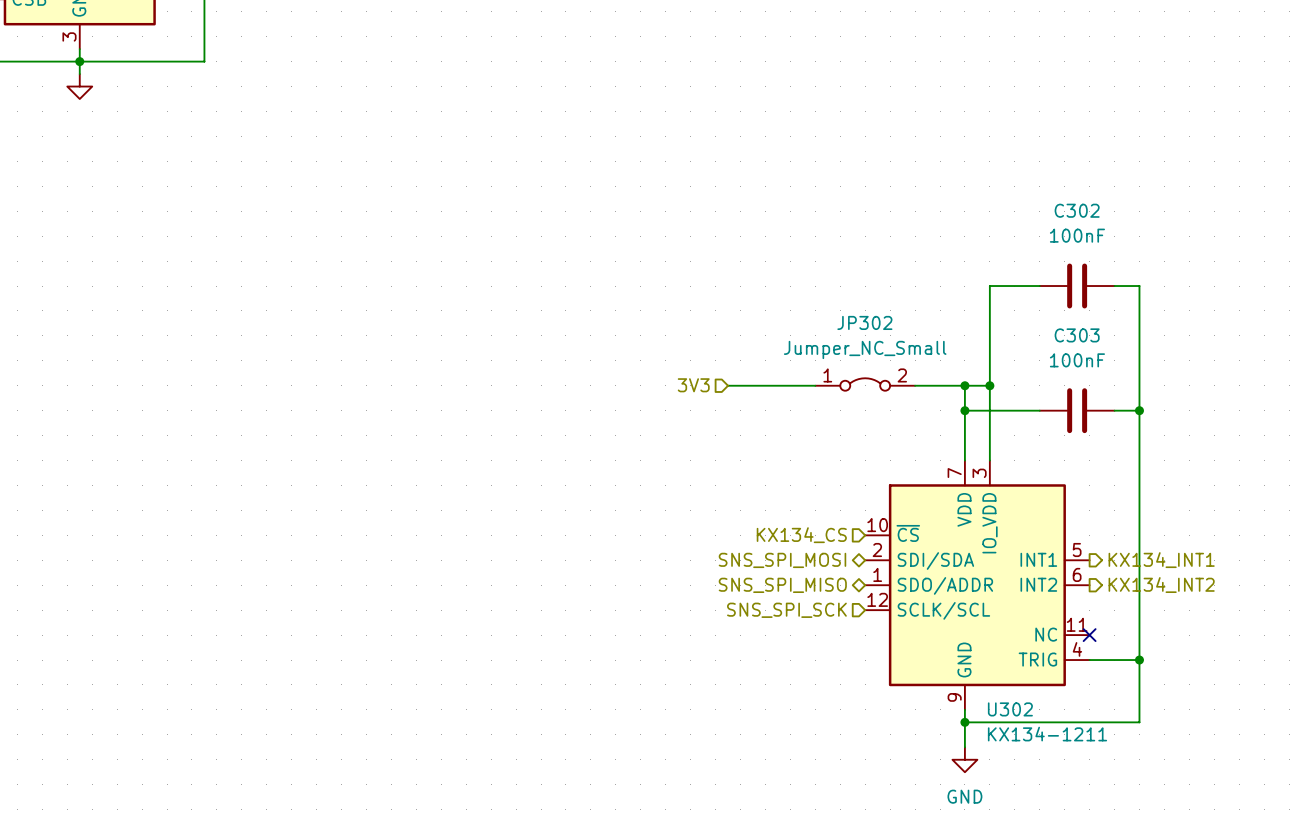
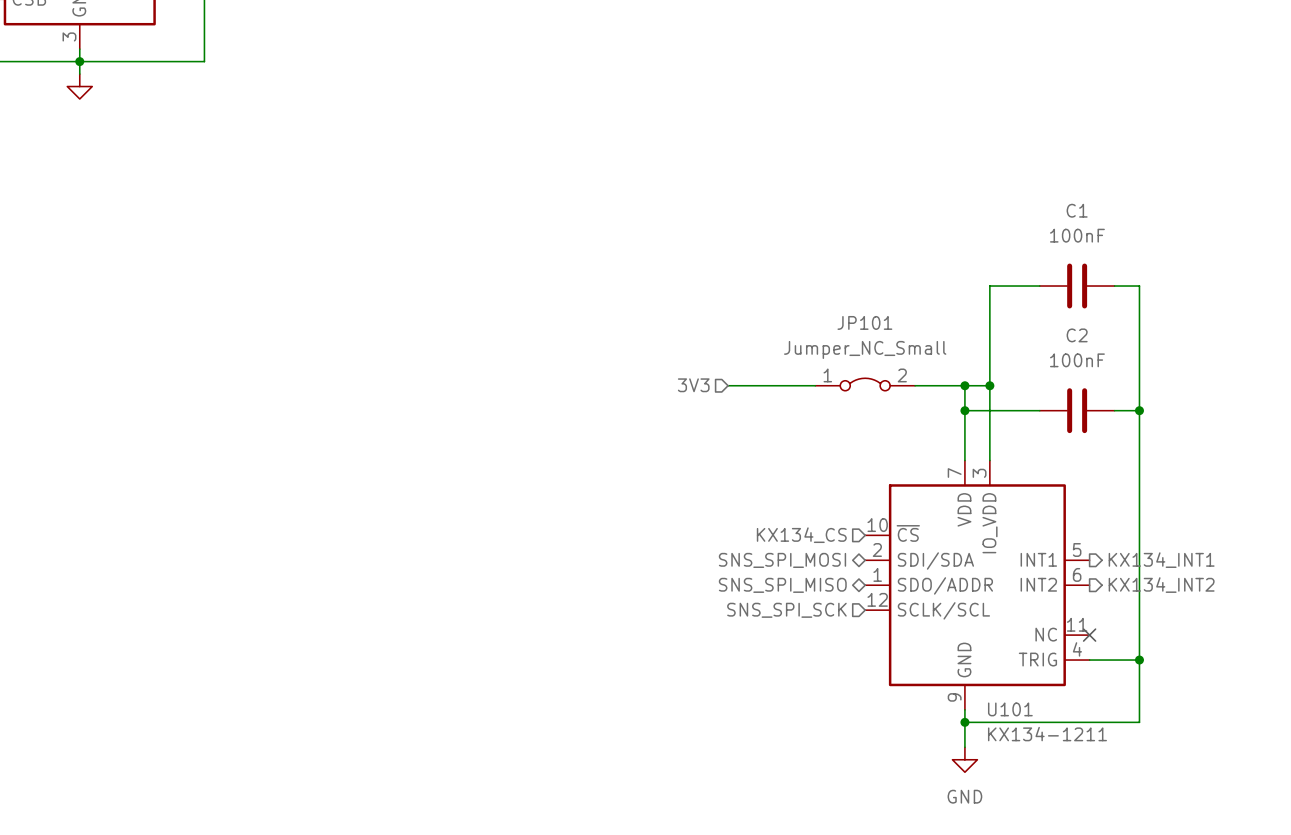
C302 name: C302 (1077, 210) -> C1 (1077, 210)
JP302 name: JP302 (864, 322) -> JP101 (864, 322)
C303 name: C303 (1077, 335) -> C2 (1077, 335)
U302 name: U302 (1010, 709) -> U101 (1010, 709)

